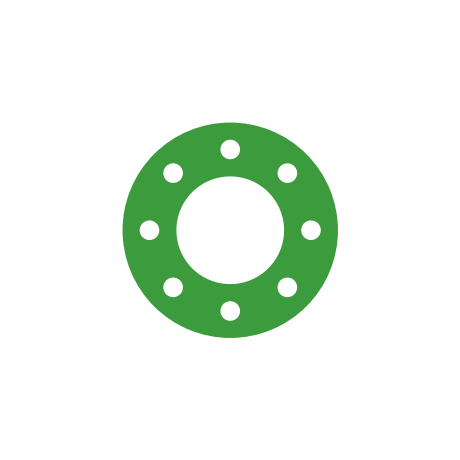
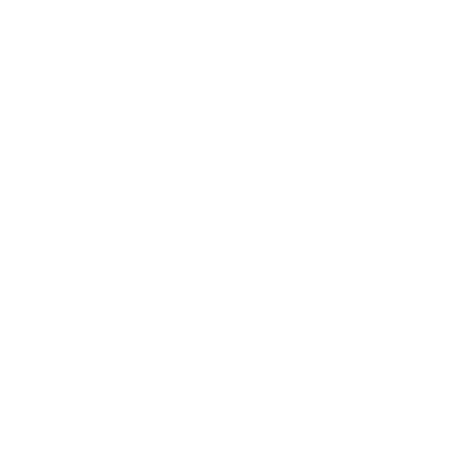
part: (230, 230) -> none

